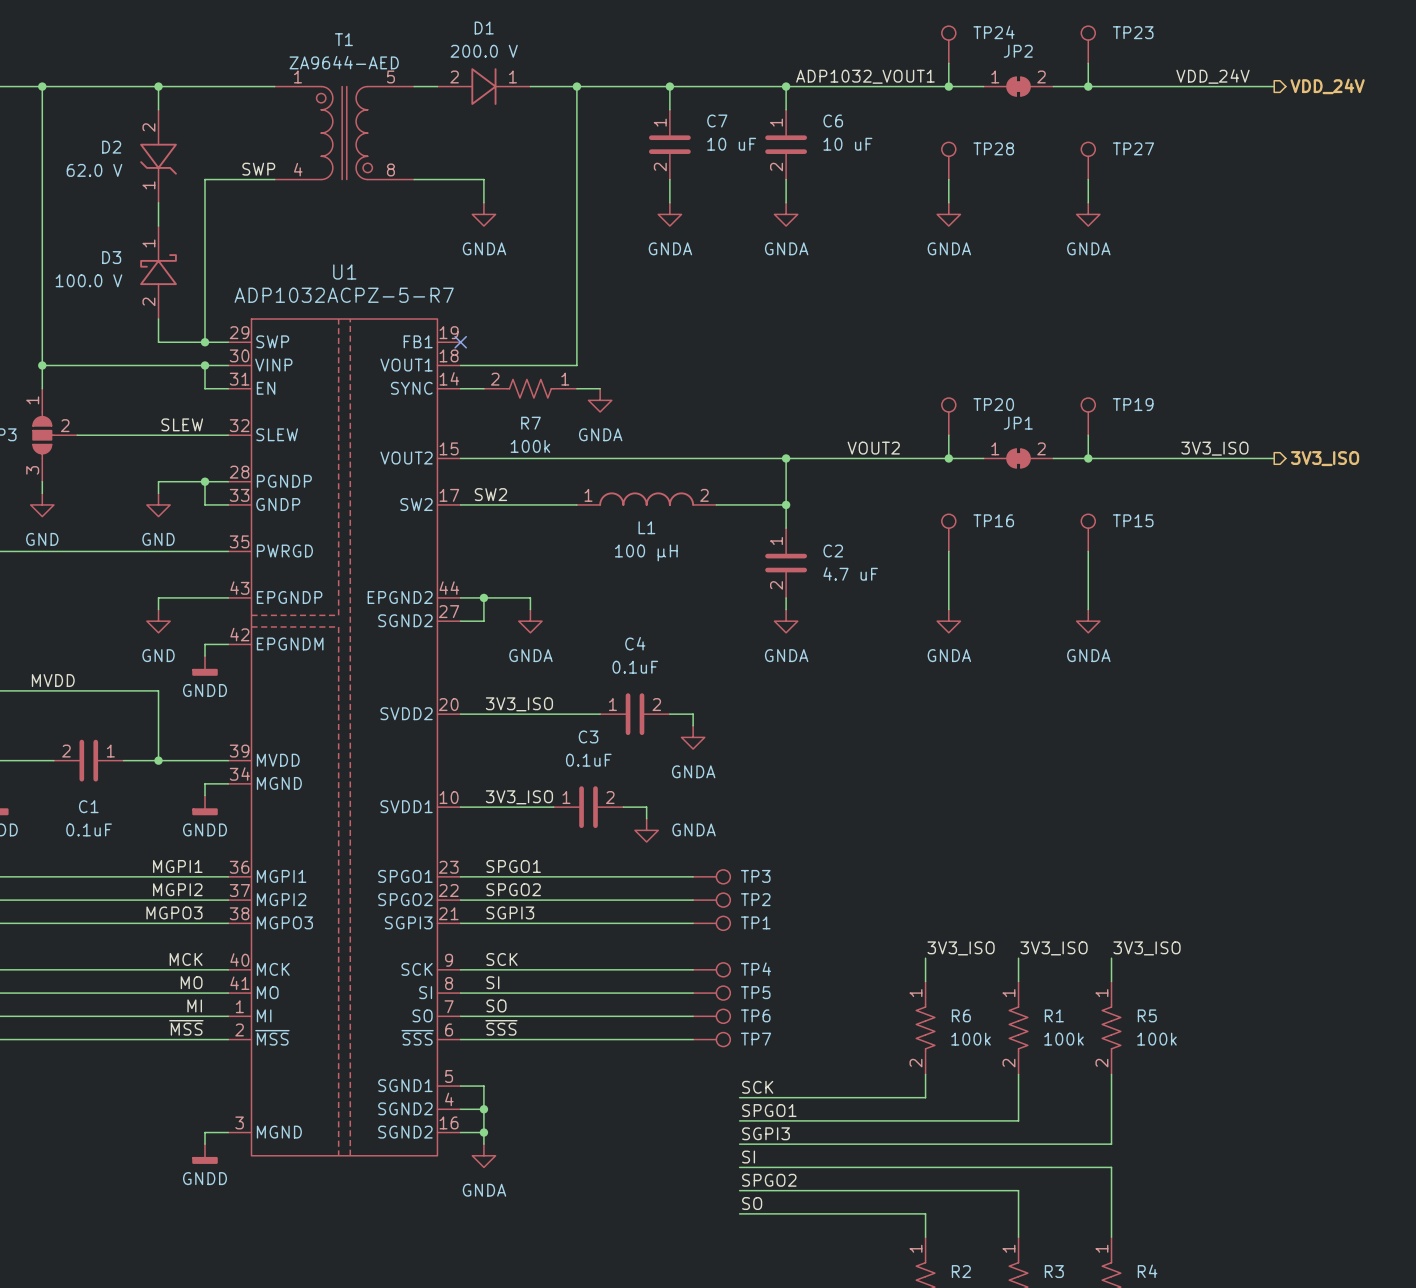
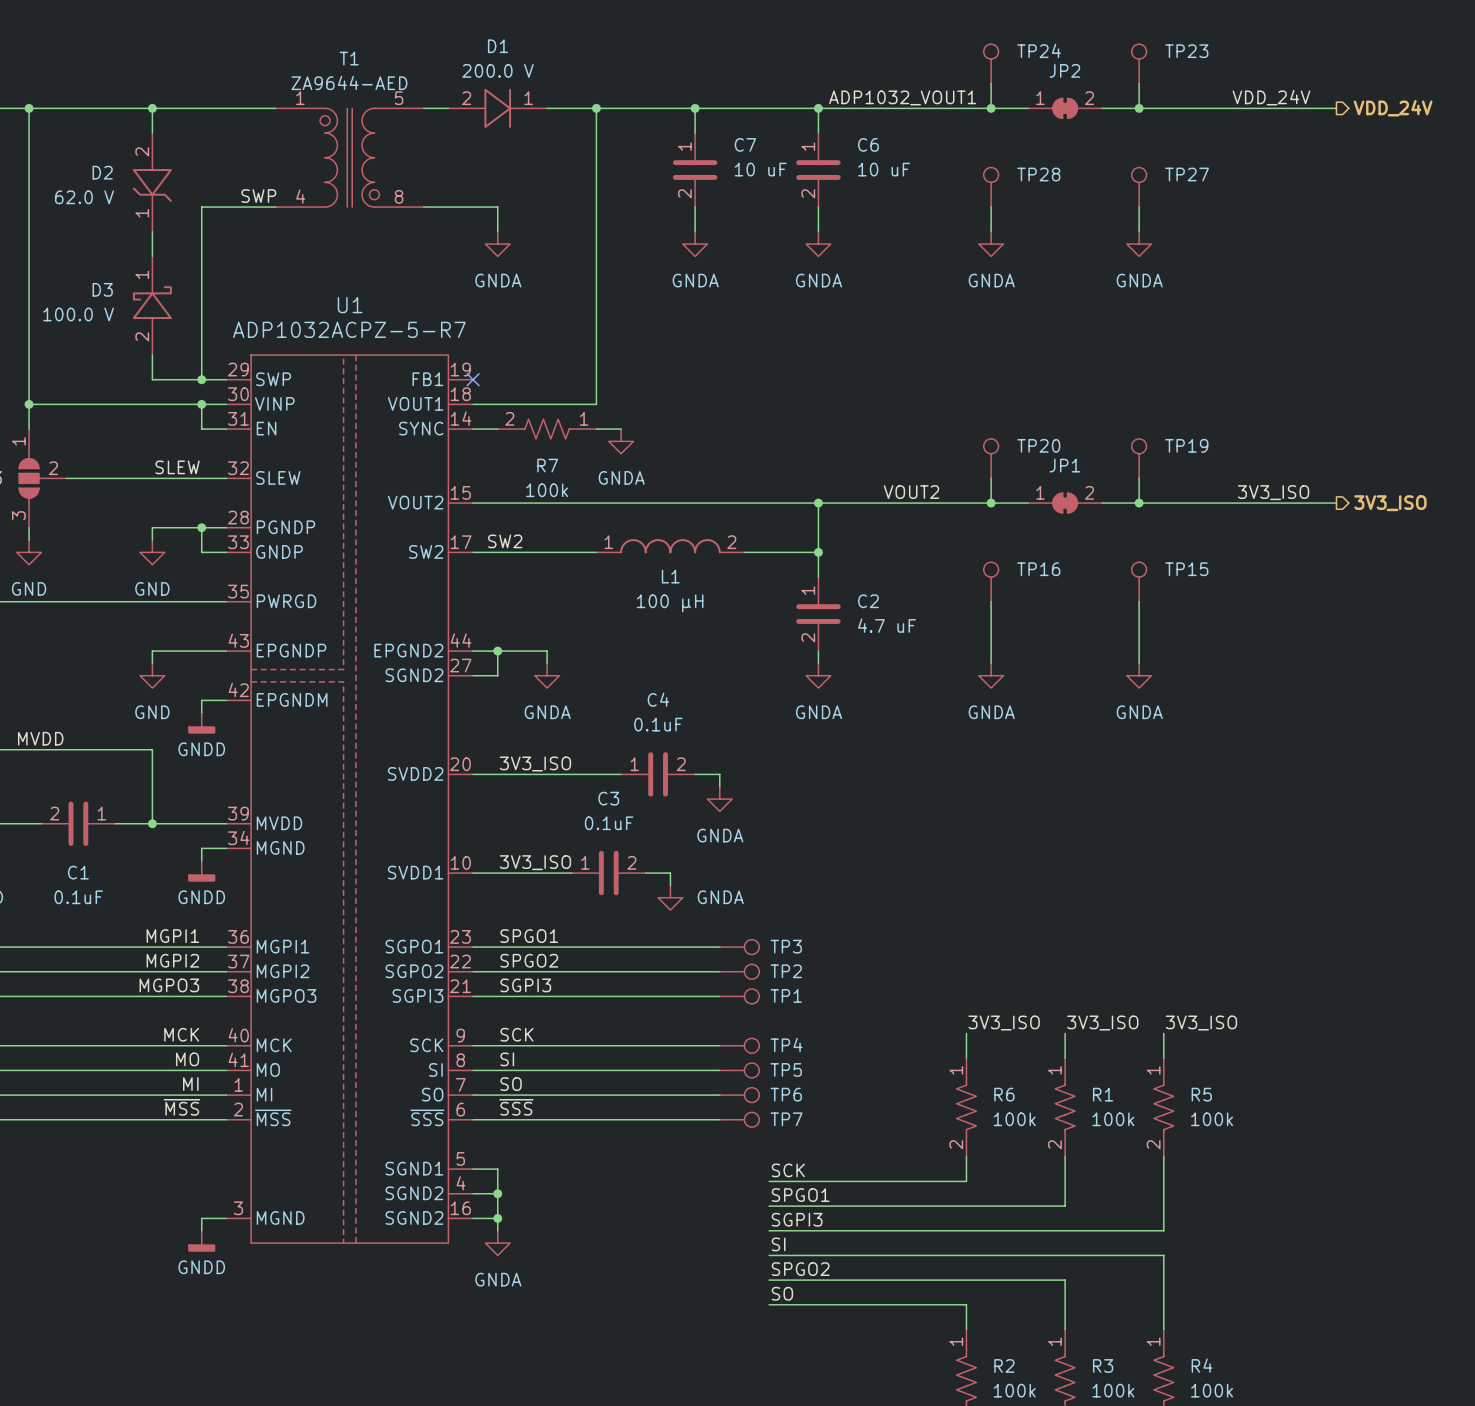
U1 pin name: SPGO1 (405, 876) -> SGPO1 (414, 946)
U1 pin name: SPGO2 (405, 899) -> SGPO2 (414, 971)

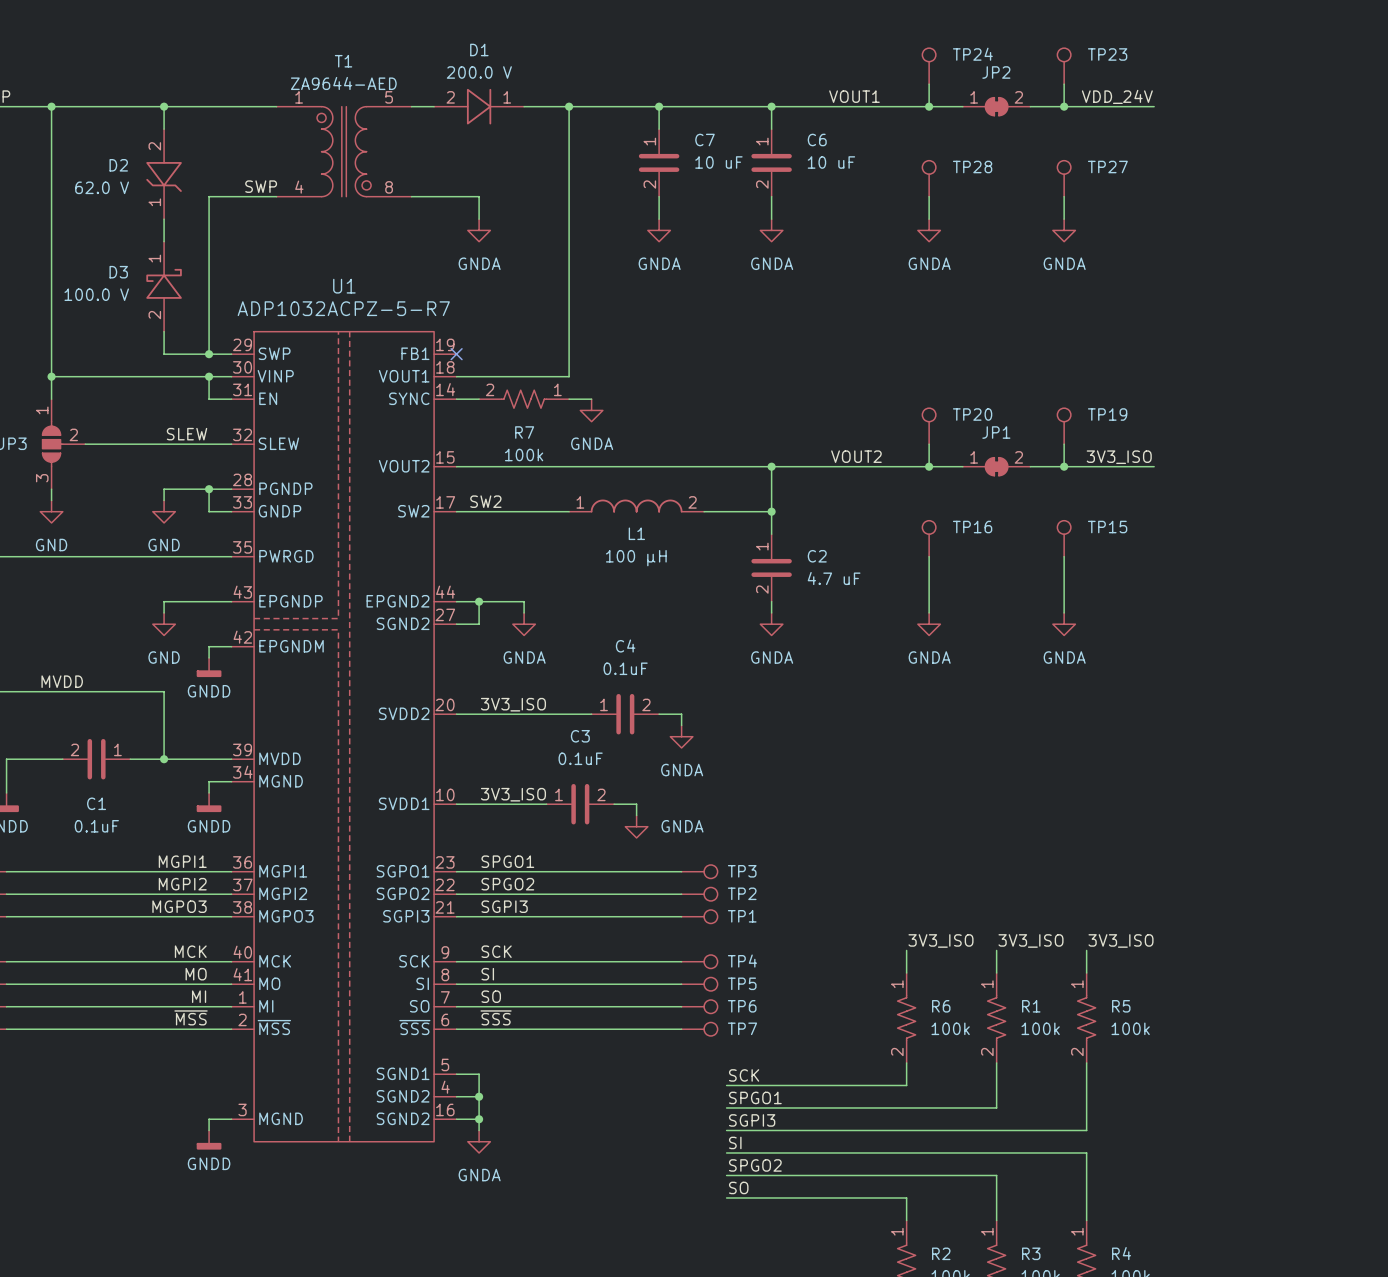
label: ADP1032_VOUT1 (902, 97) -> none
label: none -> VOUT1 (854, 96)
label position: VDD_24V (1271, 97) -> VDD_24V (1117, 96)
wire: (1237, 108) (1336, 108) -> none
hierarchical label: VDD_24V (1393, 108) -> none
label position: 3V3_ISO (1273, 492) -> 3V3_ISO (1119, 457)
wire: (1237, 503) (1336, 503) -> none
hierarchical label: 3V3_ISO (1390, 503) -> none

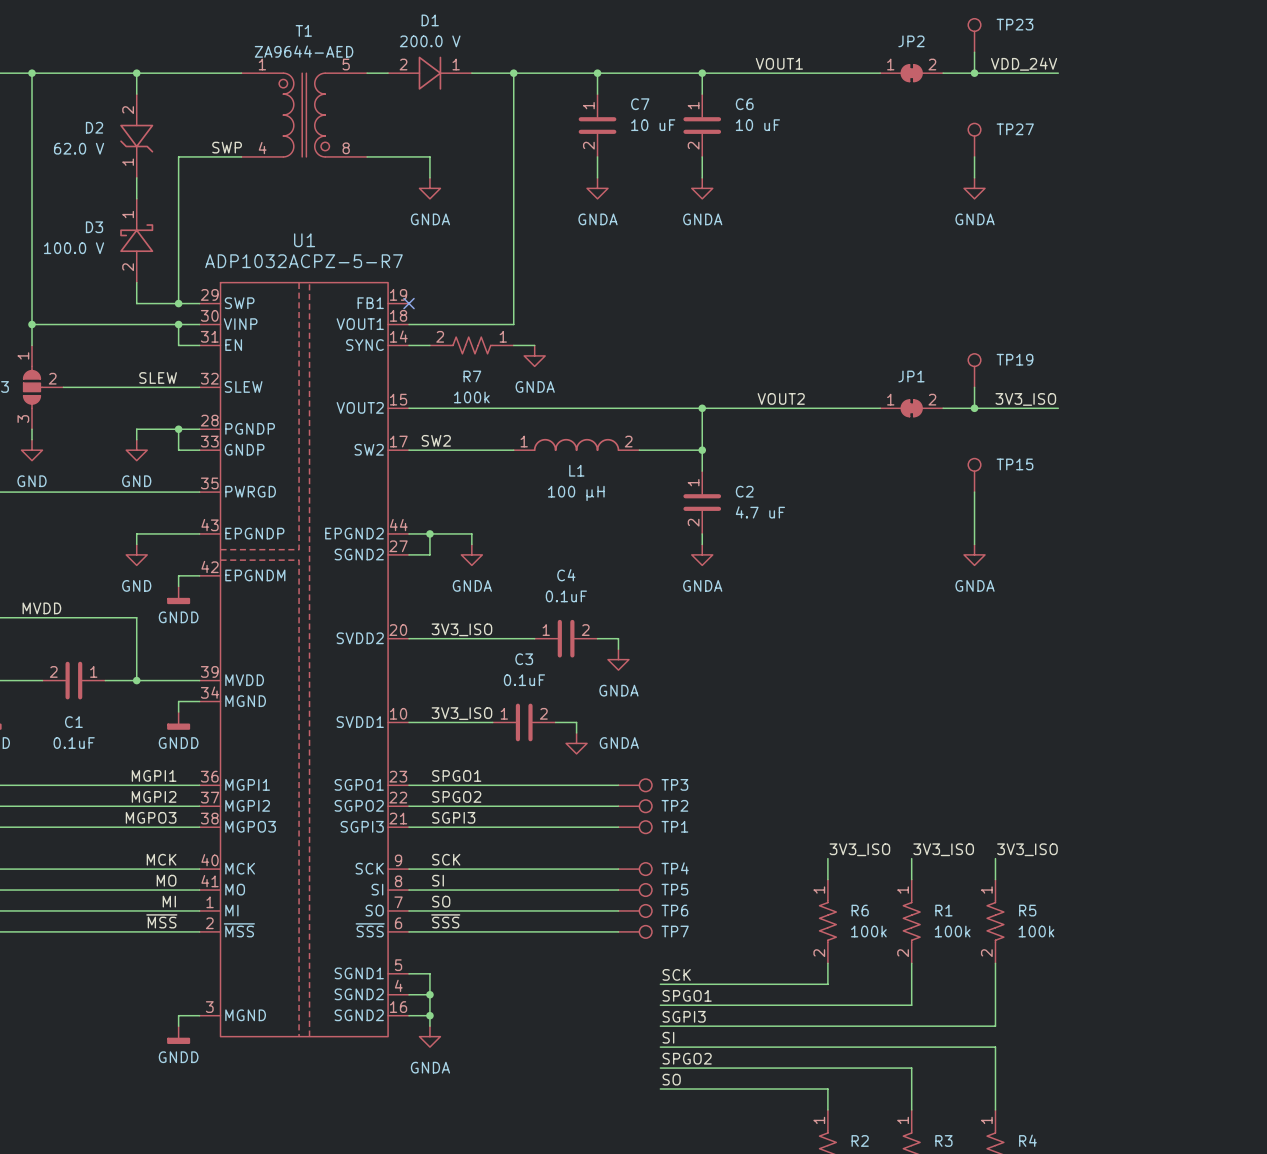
TP24: (929, 66) -> none
wire: (929, 84) (929, 106) -> none
junction: (929, 106) -> none
TP28: (929, 178) -> none
wire: (929, 196) (929, 219) -> none
power symbol: GNDA (929, 230) -> none
TP20: (929, 426) -> none
wire: (929, 444) (929, 466) -> none
junction: (929, 466) -> none
TP16: (929, 538) -> none
wire: (929, 556) (929, 612) -> none
power symbol: GNDA (929, 624) -> none

